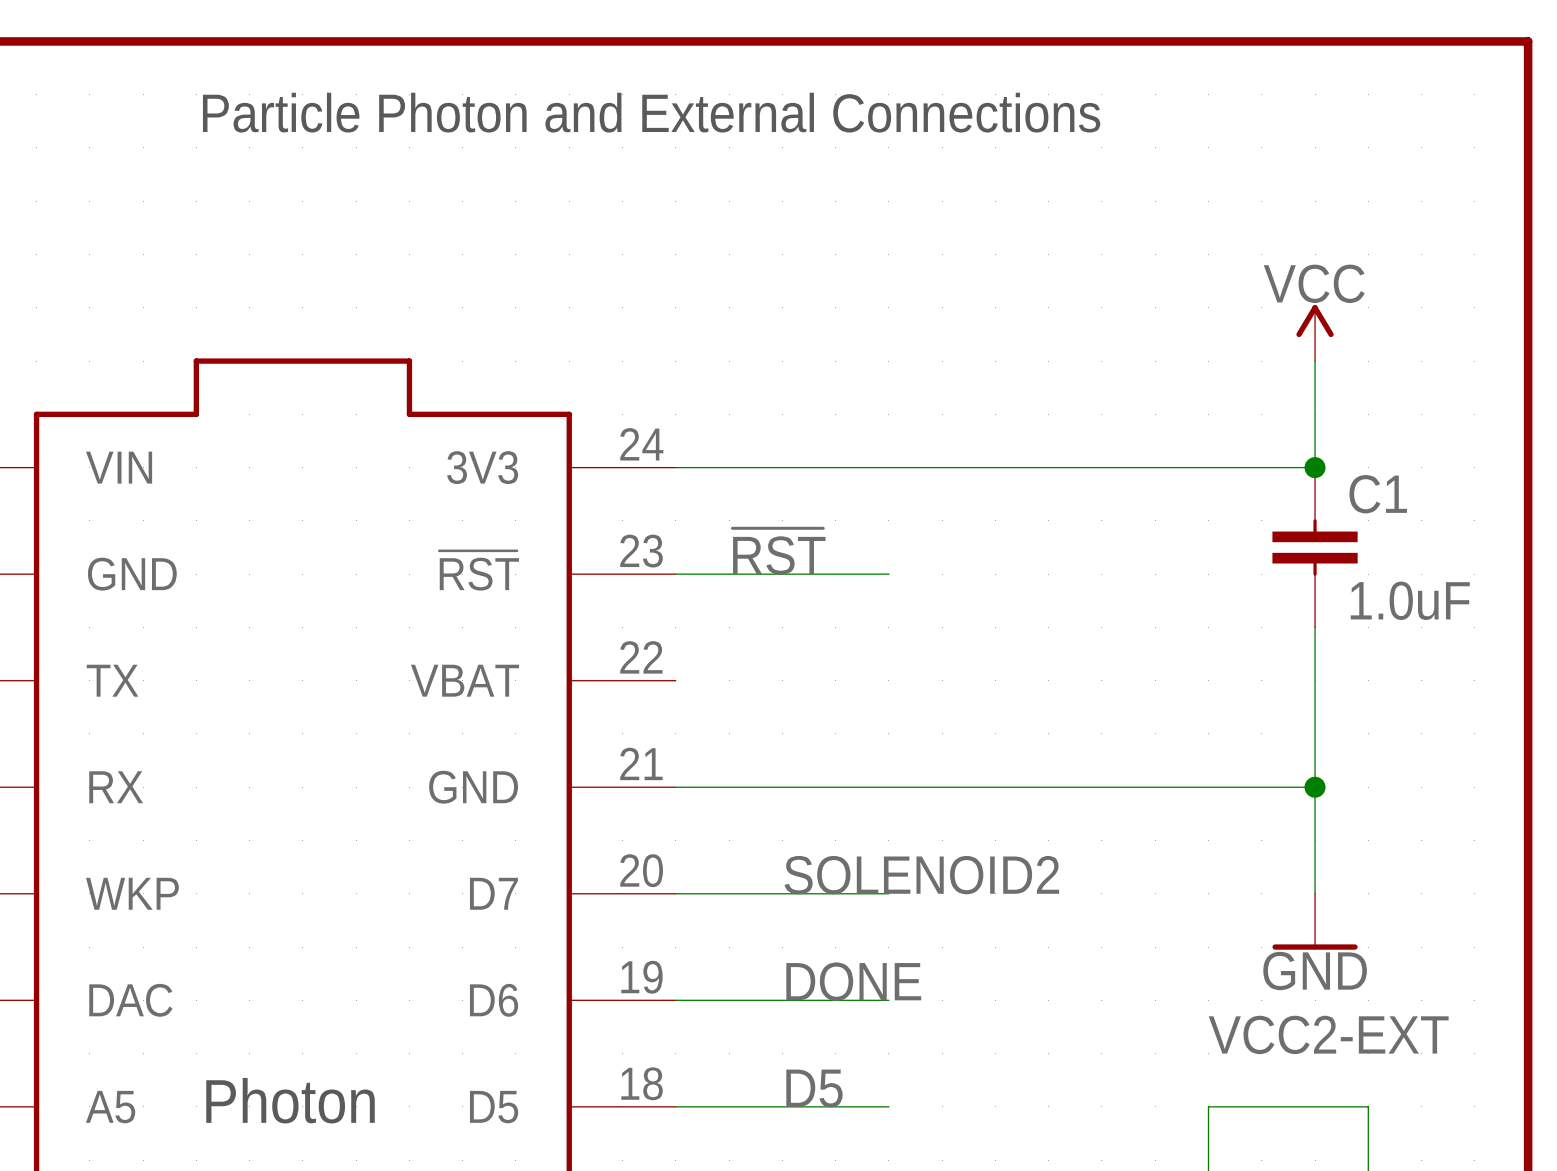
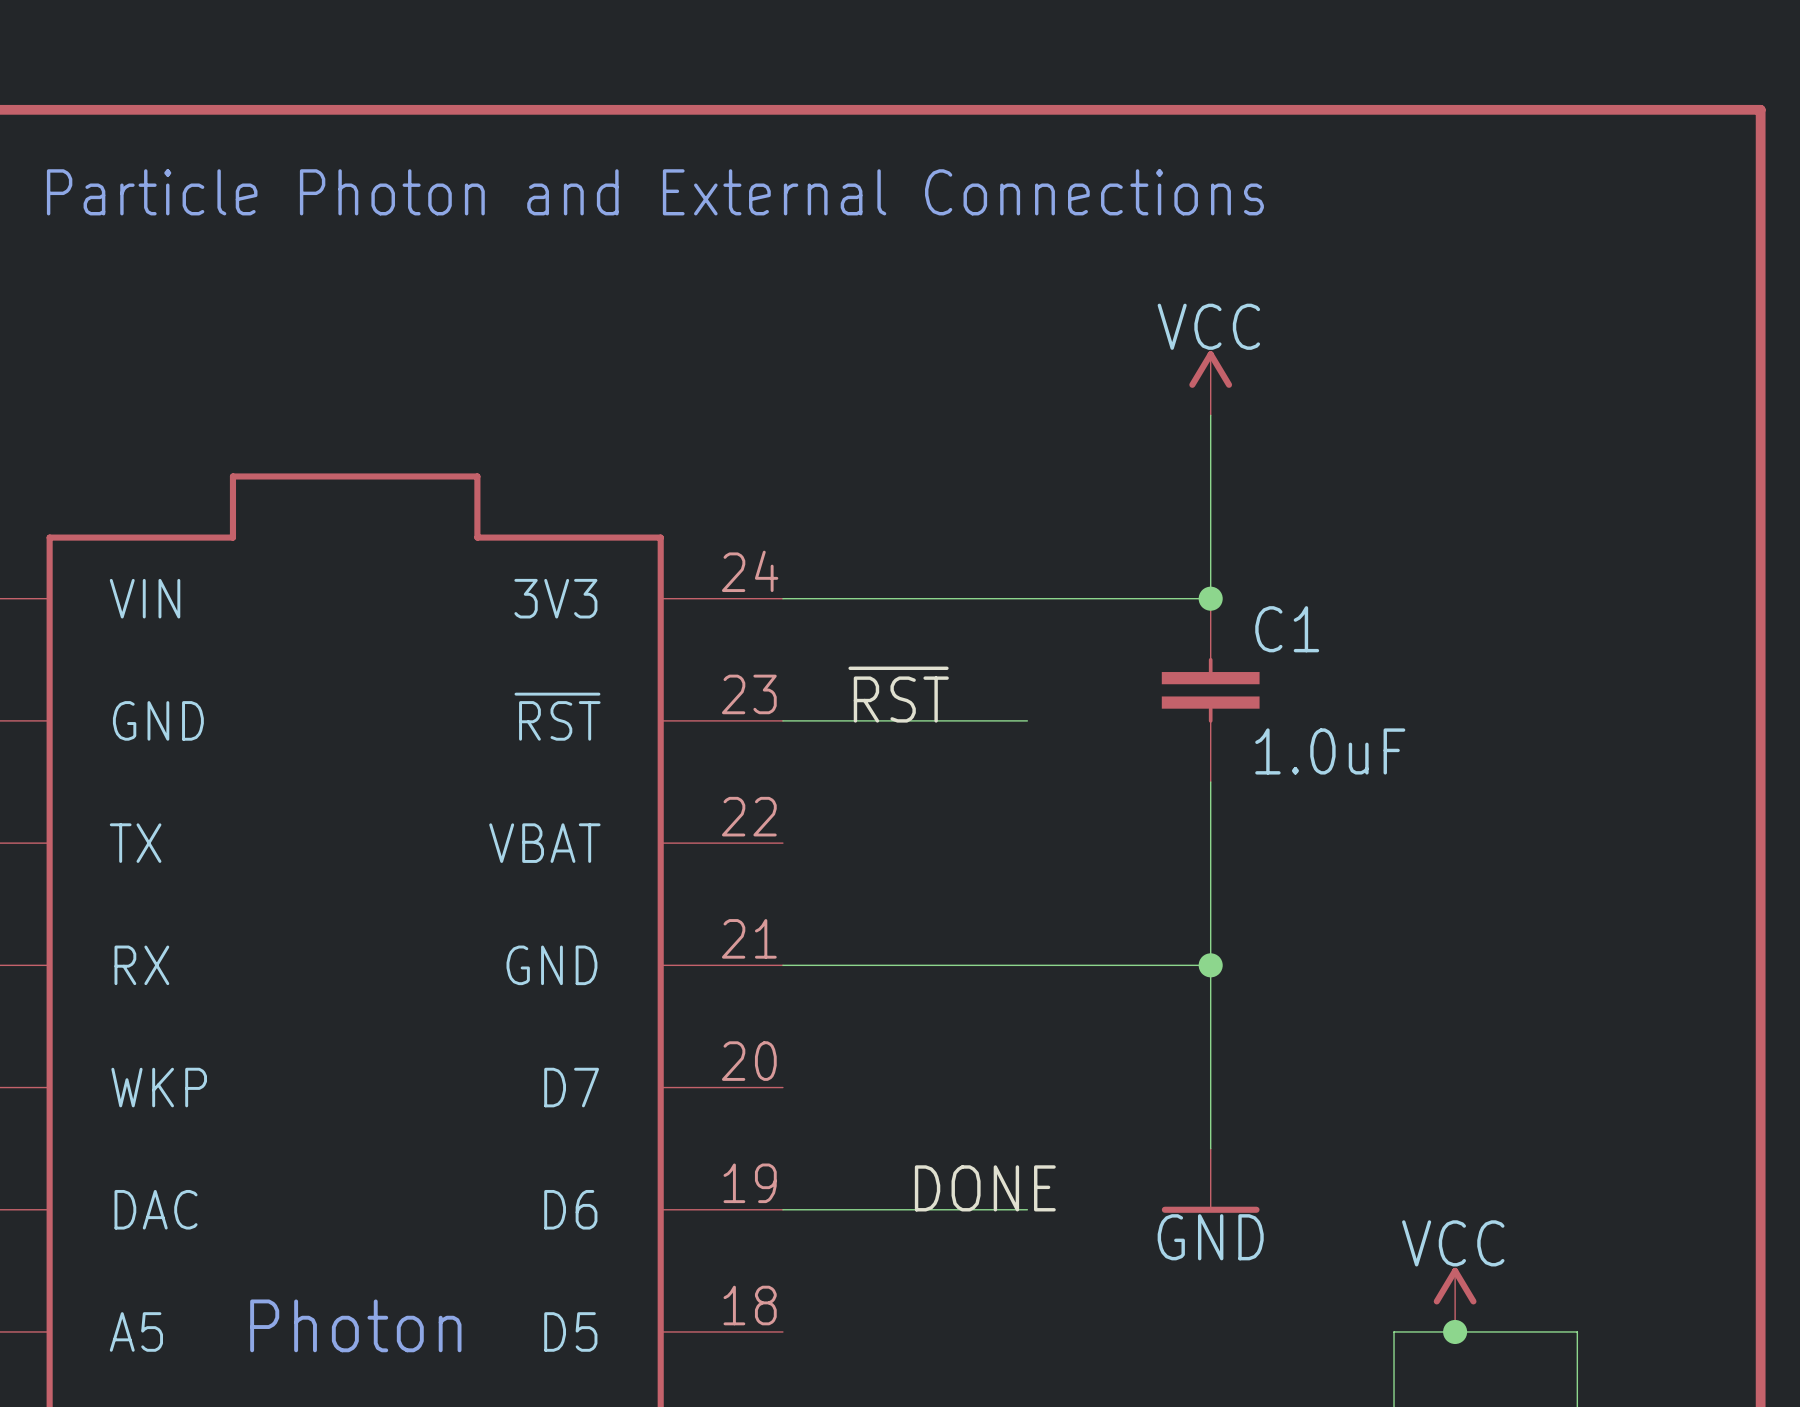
power symbol position: VCC (1315, 333) -> VCC (1210, 383)
wire: (1315, 361) (1315, 467) (1048, 467) -> (1210, 415) (1210, 598)
junction: none -> (1210, 598)
junction: (1315, 467) -> none
C1 position: (1315, 547) -> (1210, 690)
wire: none -> (1210, 782) (1210, 1148)
wire: (1315, 627) (1315, 893) -> none
wire: (1048, 787) (1315, 787) -> none
junction: none -> (1210, 965)
junction: (1315, 787) -> none
label: SOLENOID2 (921, 875) -> none
wire: (675, 893) (888, 893) -> none
power symbol position: GND (1315, 921) -> GND (1210, 1180)
label: VCC2-EXT (1328, 1034) -> none
power symbol: none -> VCC (1455, 1299)
label: D5 (814, 1088) -> none
wire: (675, 1106) (888, 1106) -> none
junction: none -> (1455, 1331)

